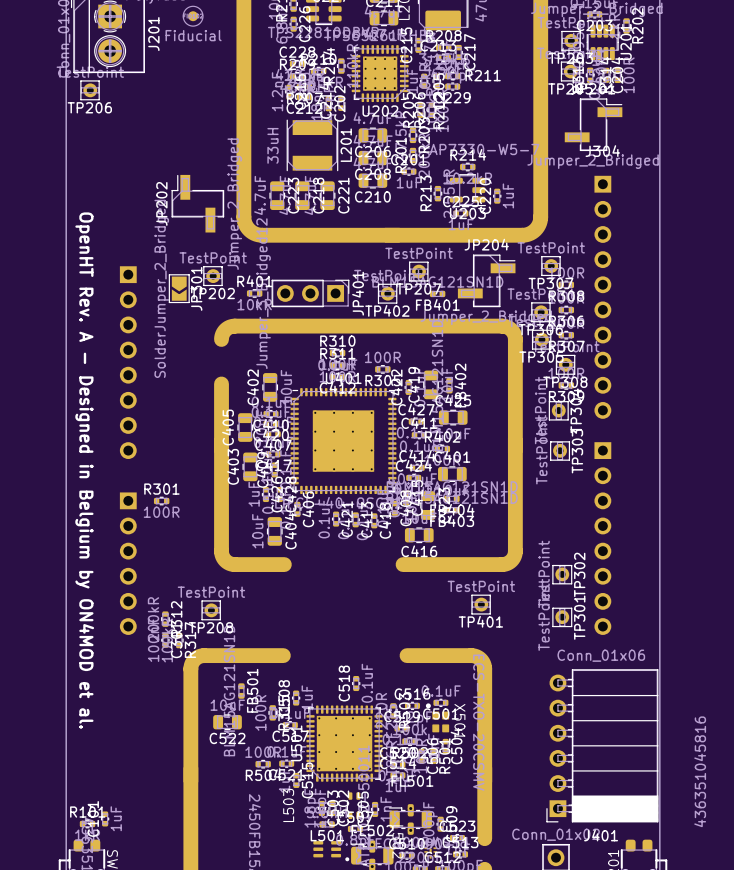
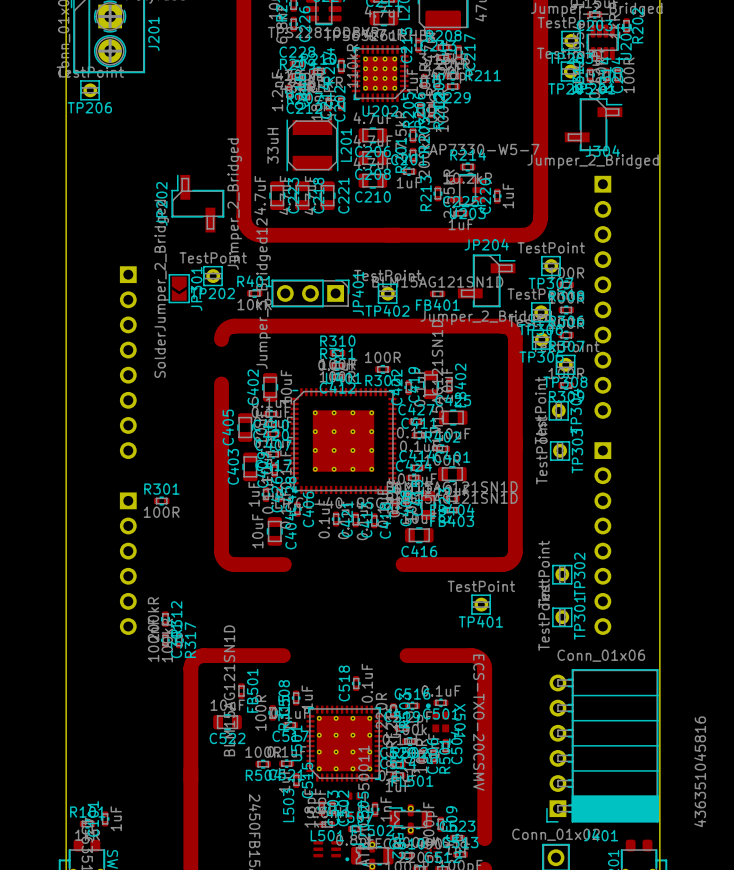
part: Fiducial (193, 16) -> none
TP207: TestPoint (418, 271) -> none
text: OpenHT Rev. A - Designed in Belgium by ON4MOD et al. (84, 470) -> none
TP208: TestPoint (211, 610) -> none

